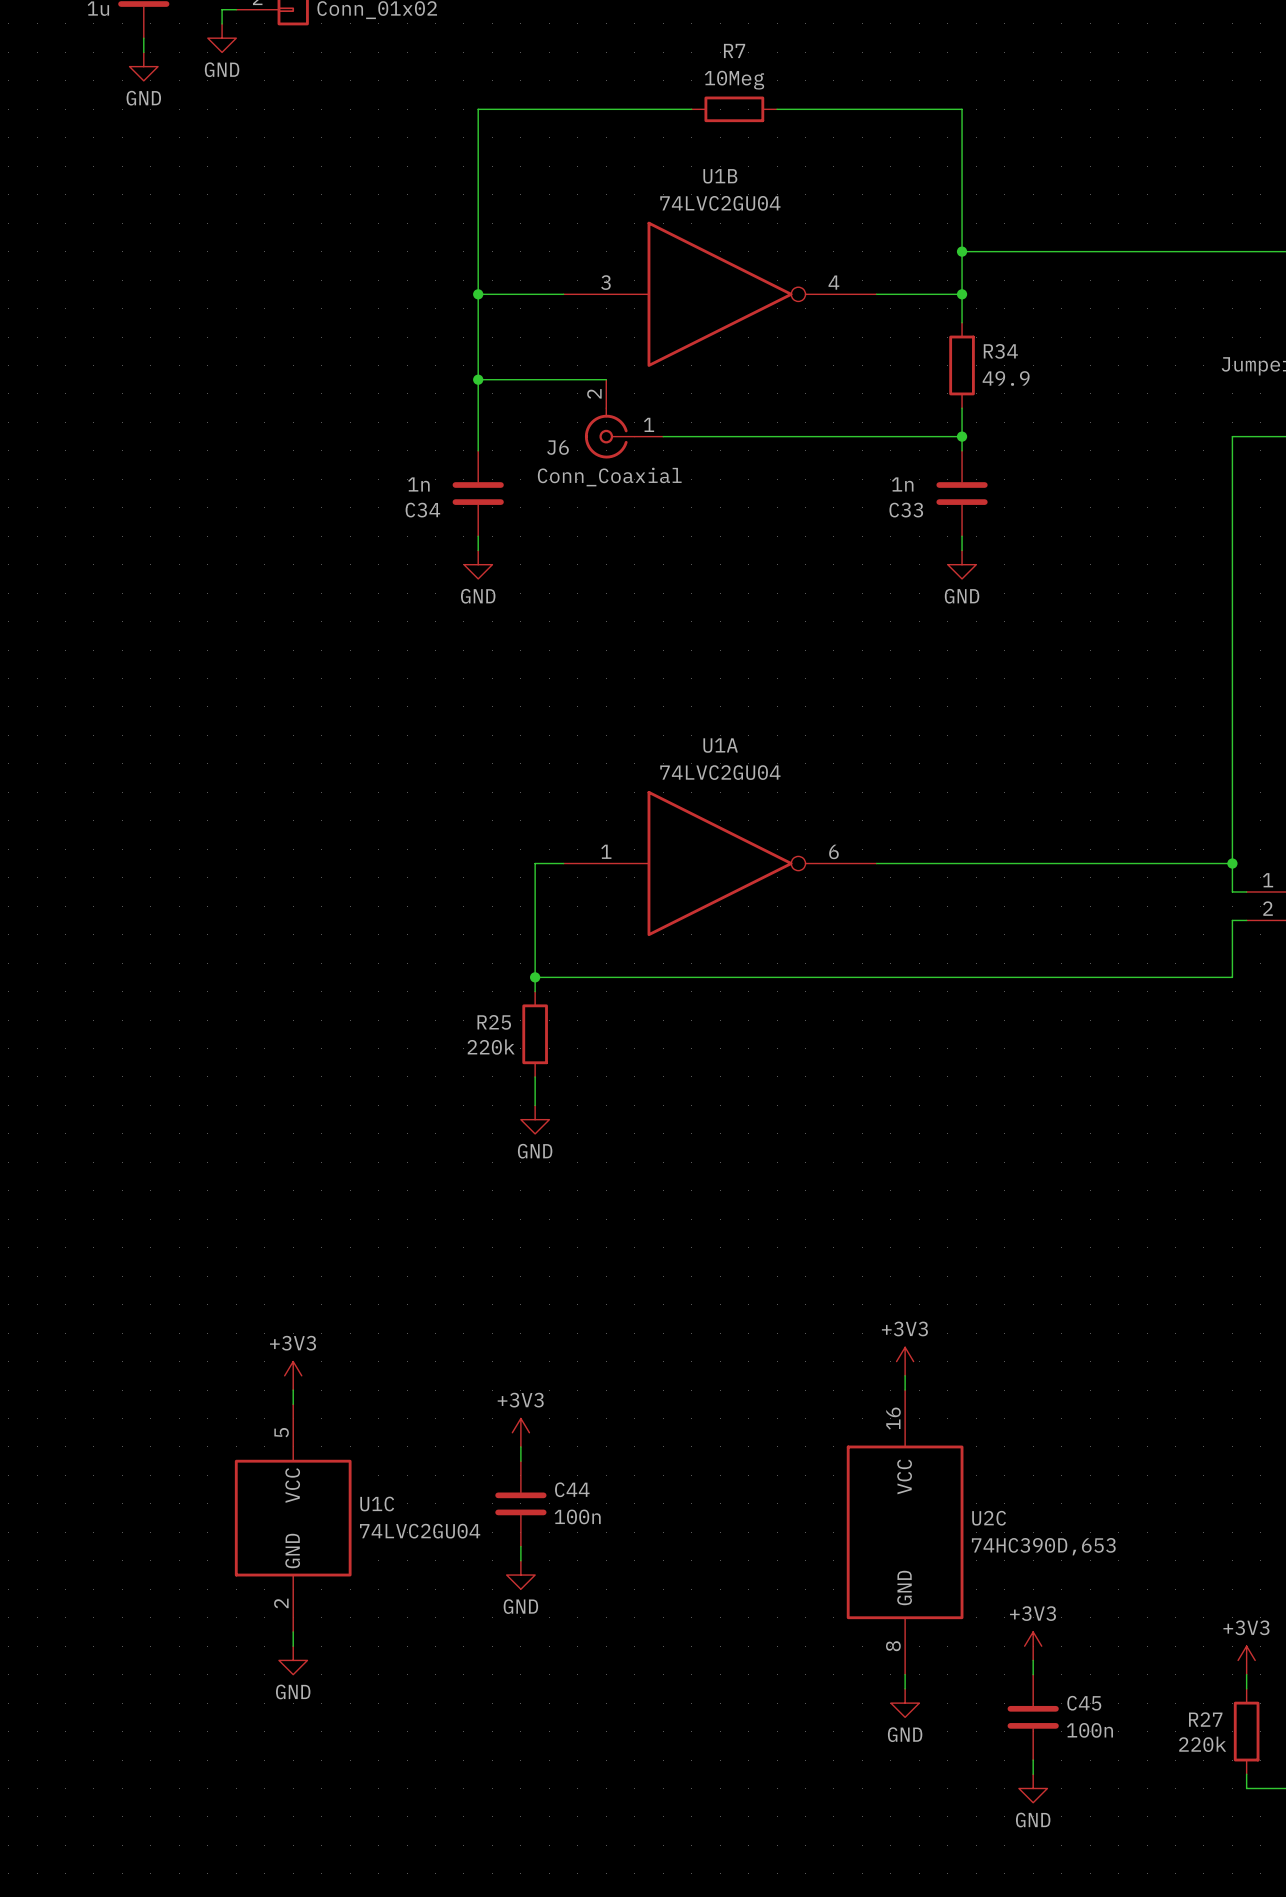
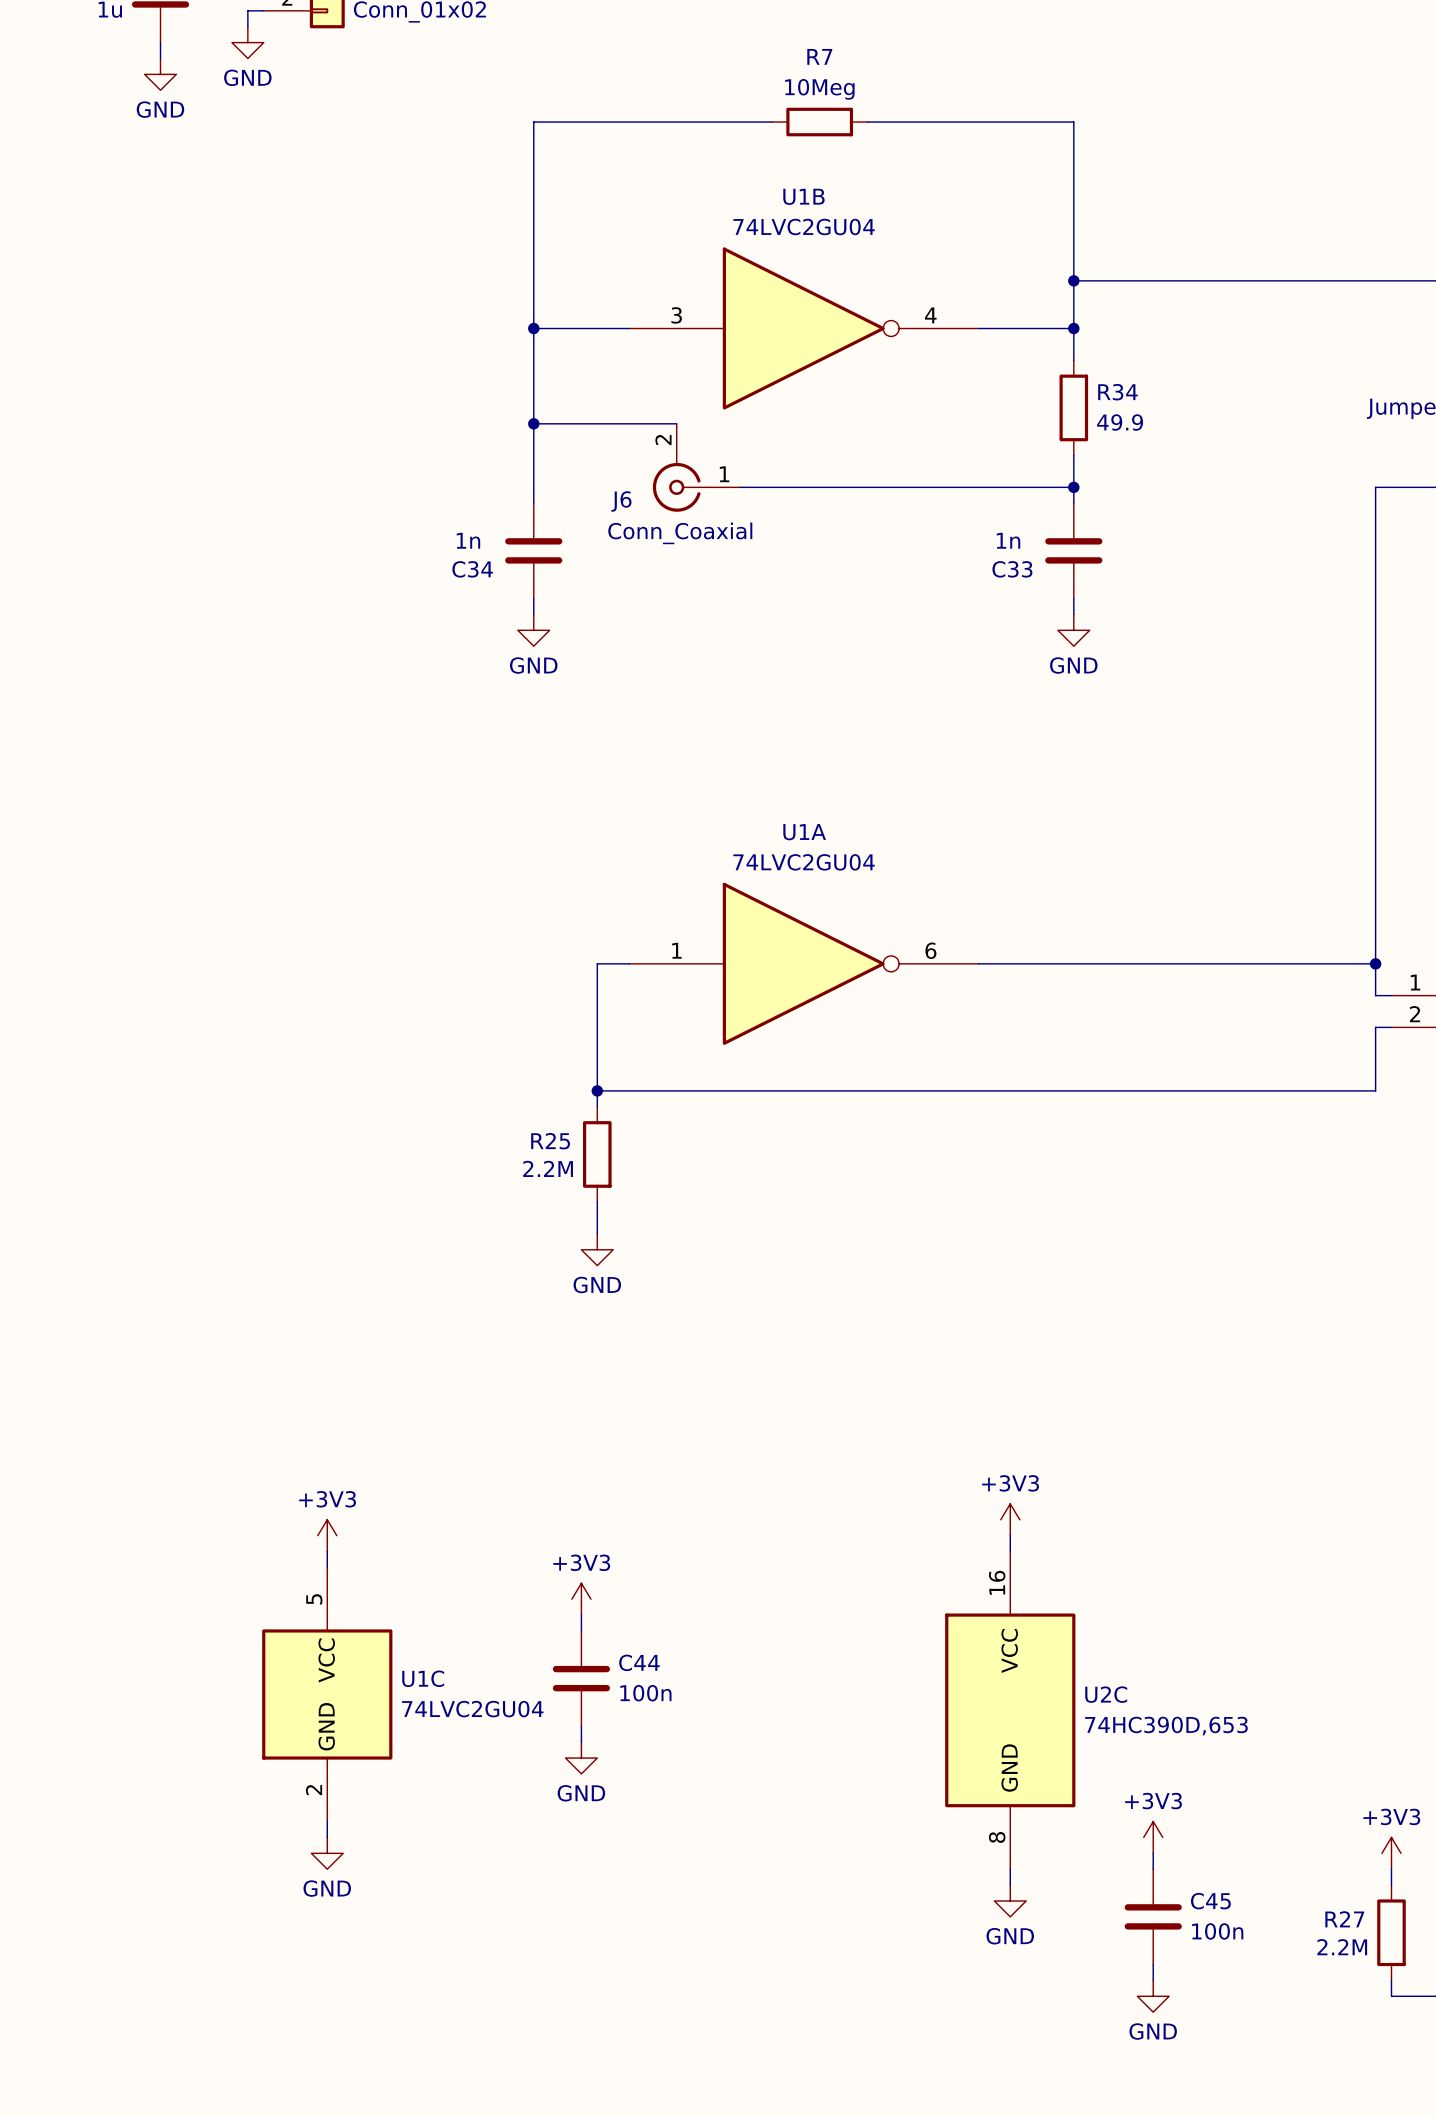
R25 value: 220k (491, 1047) -> 2.2M (548, 1168)
R27 value: 220k (1202, 1744) -> 2.2M (1342, 1947)

